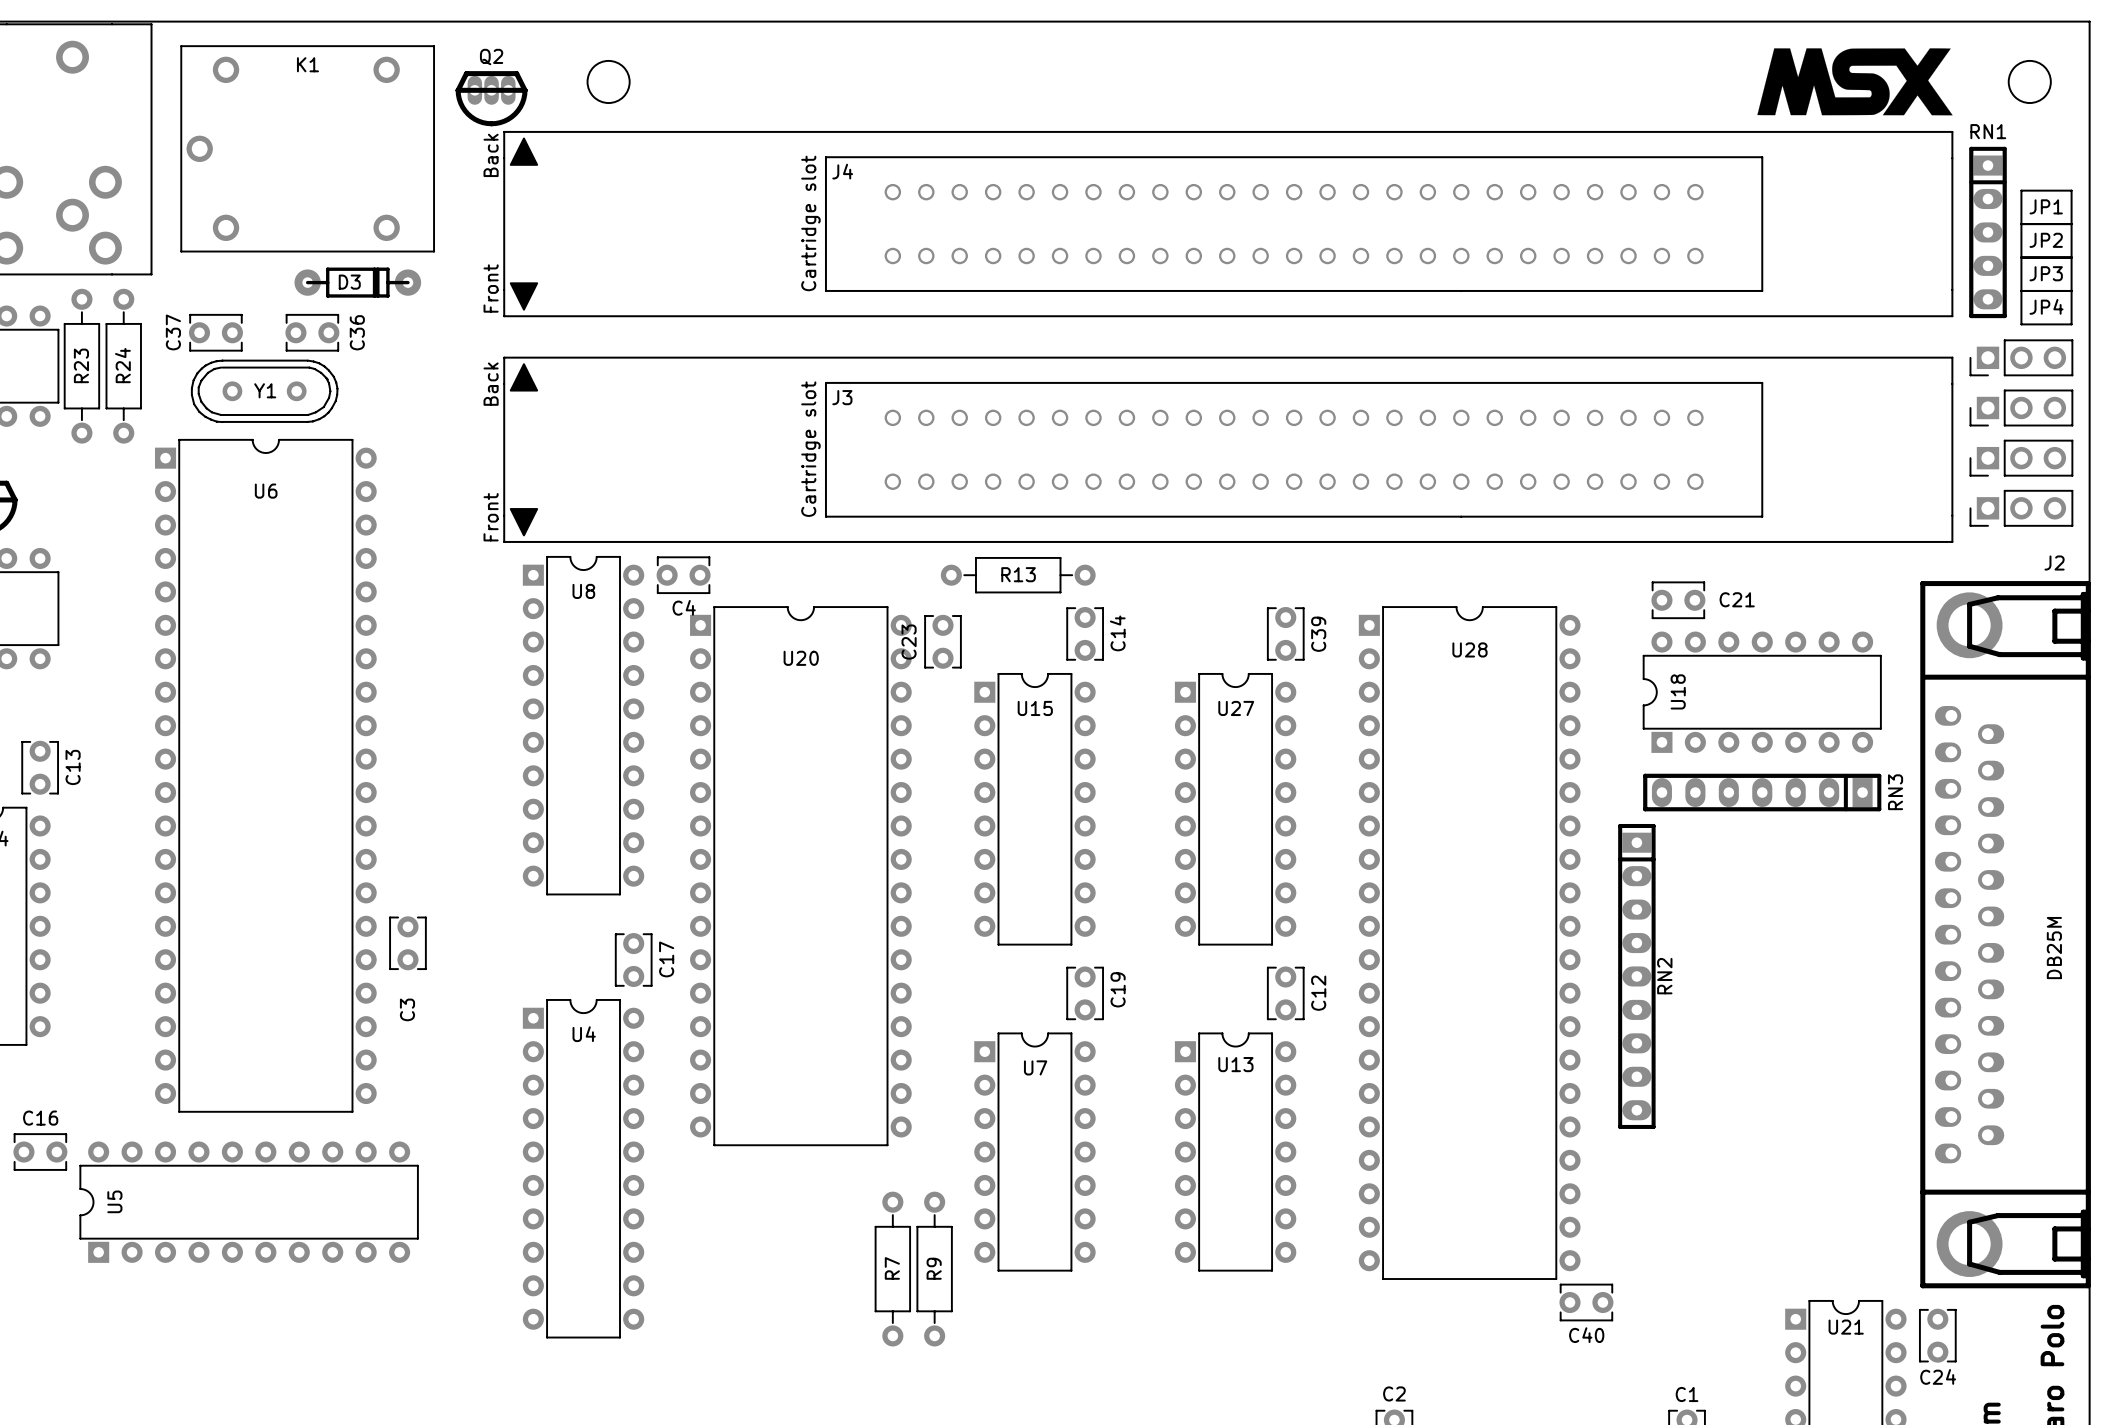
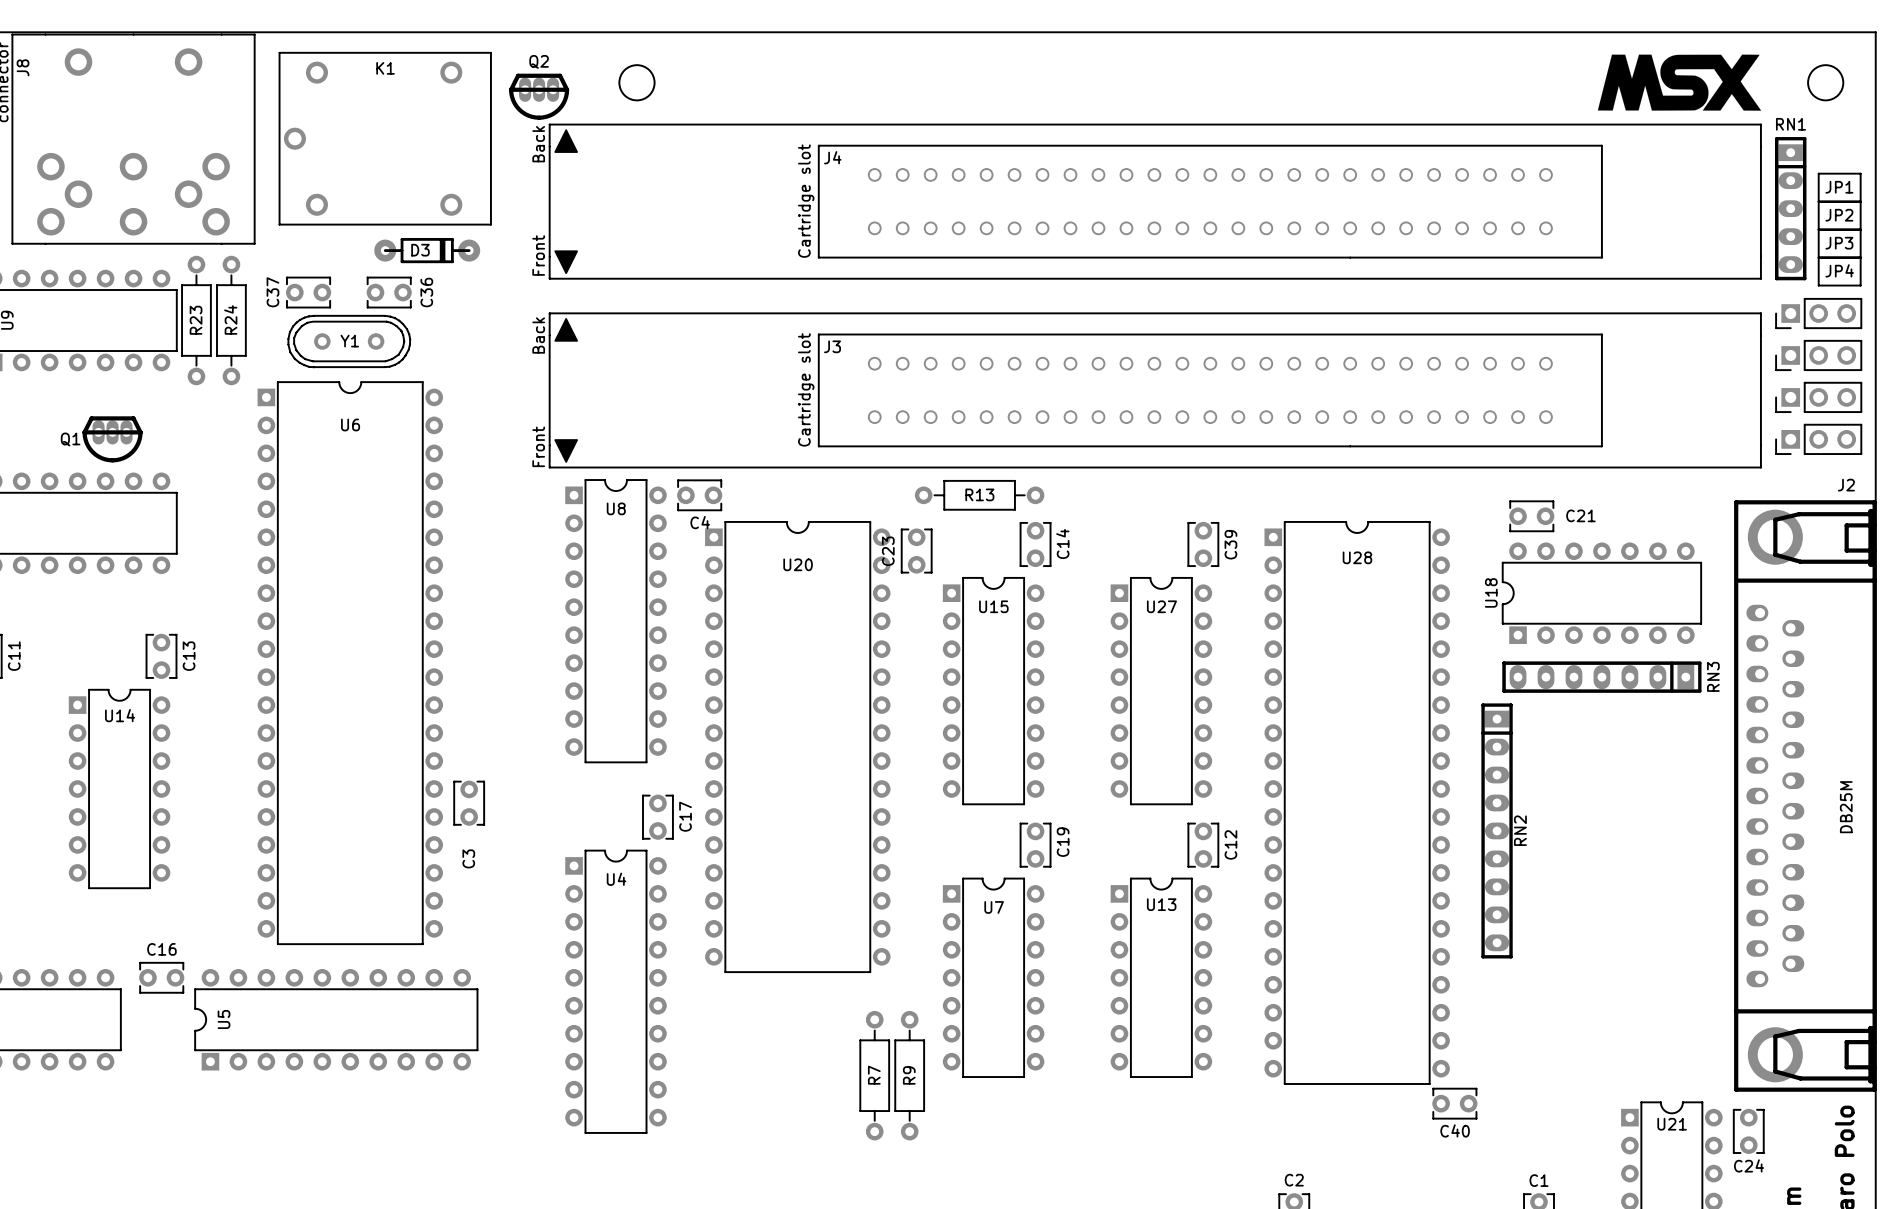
U18 name position: U18 (1678, 691) -> U18 (1491, 592)

